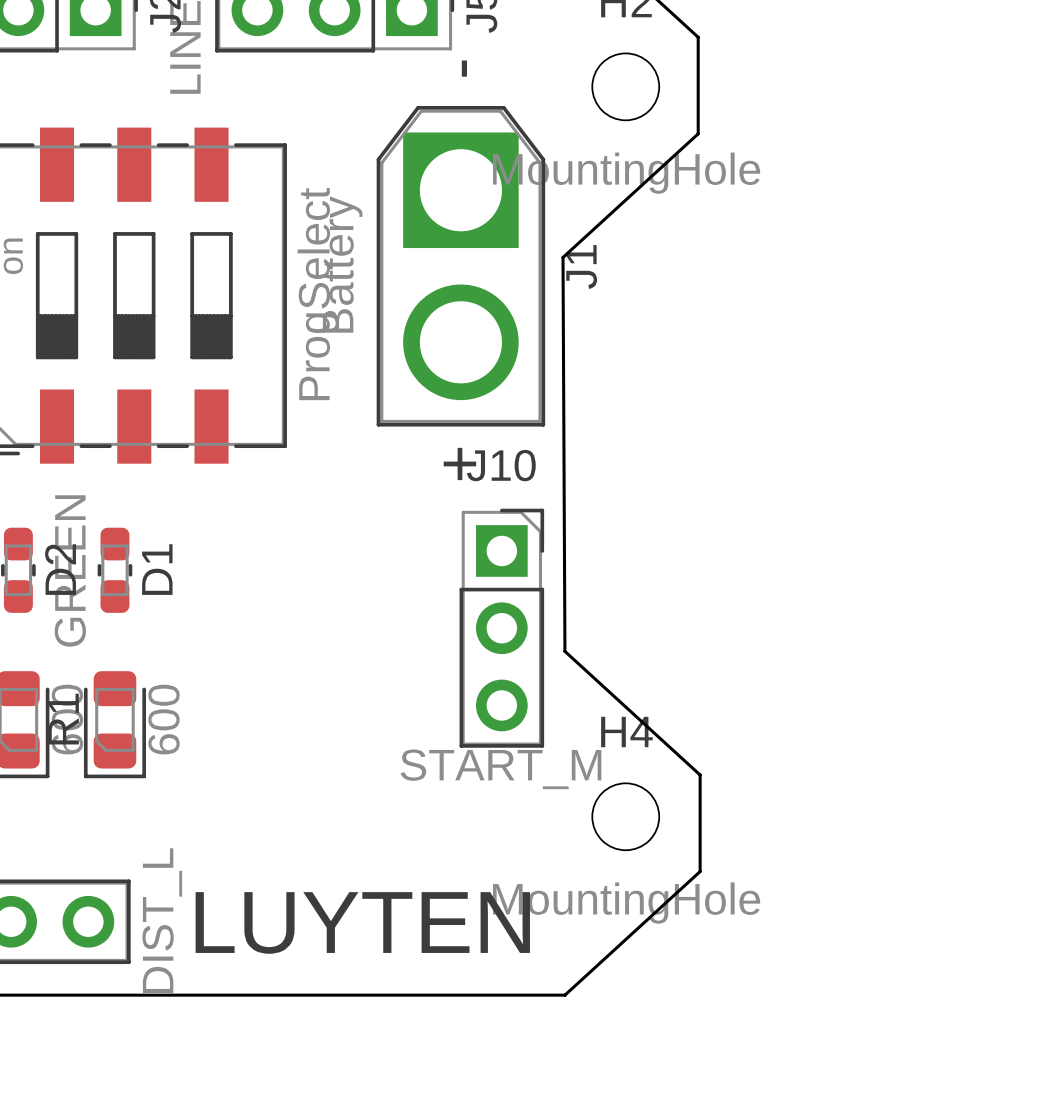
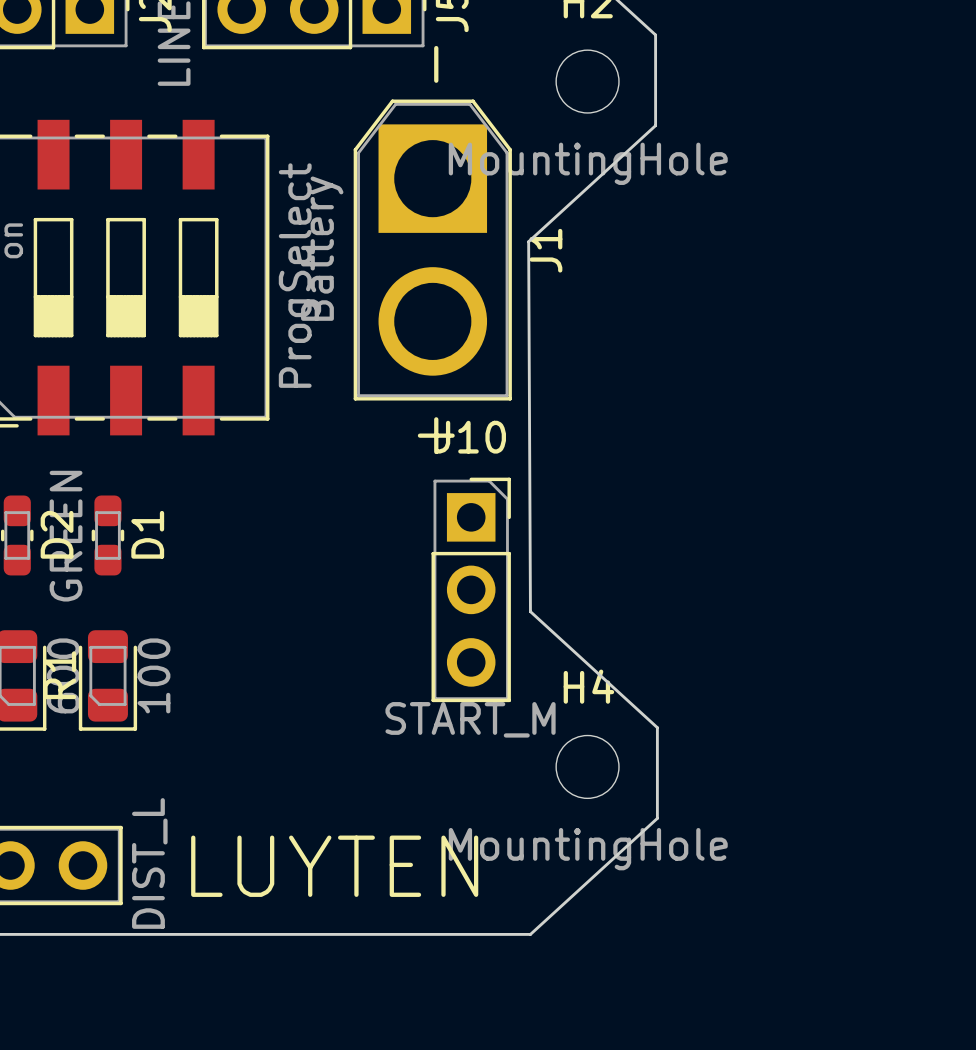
R1 value: 600 (164, 719) -> 100 (154, 675)

